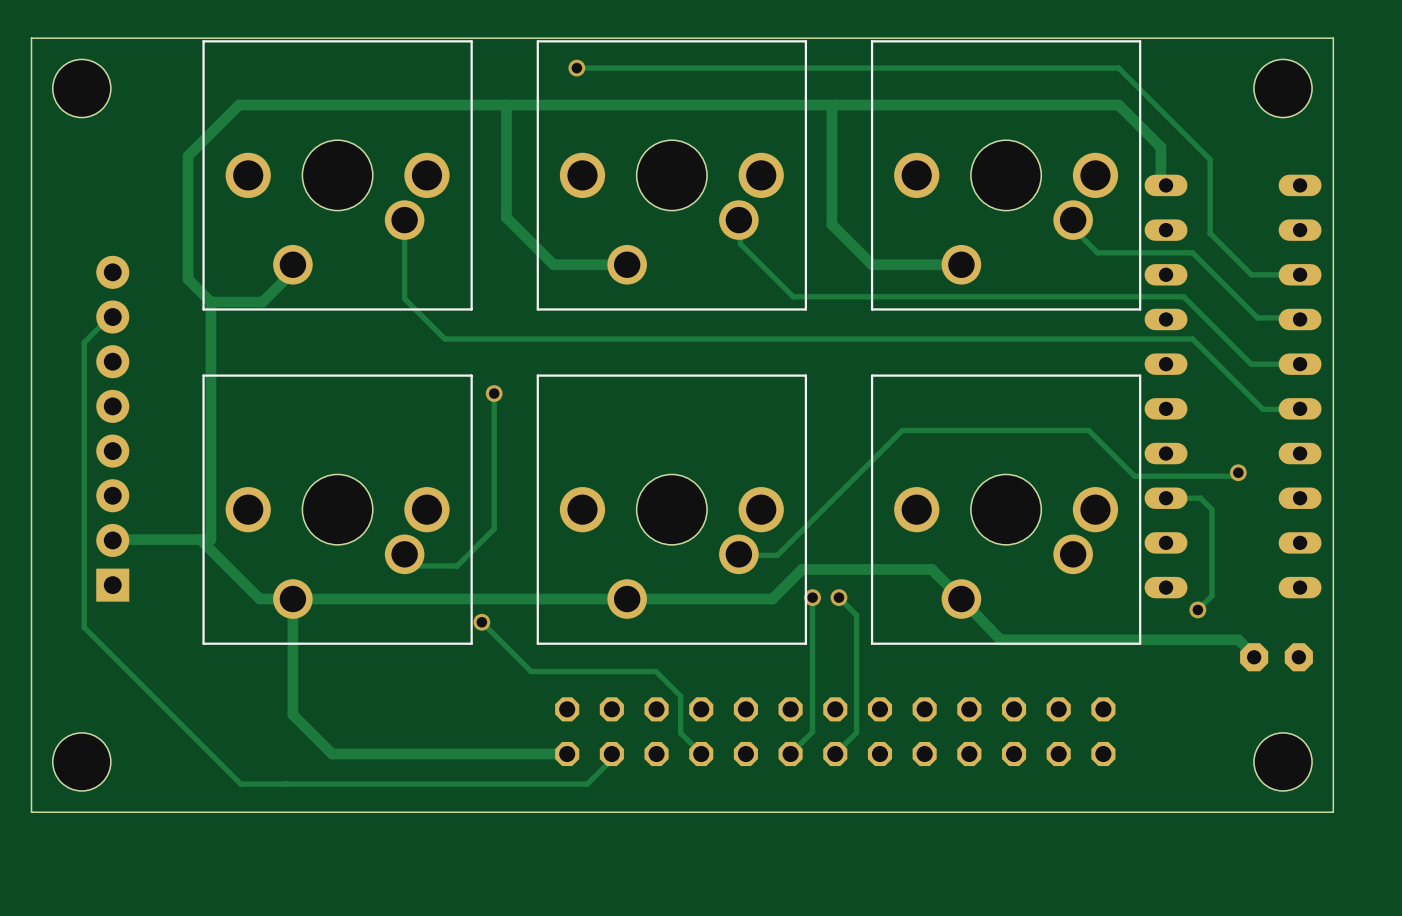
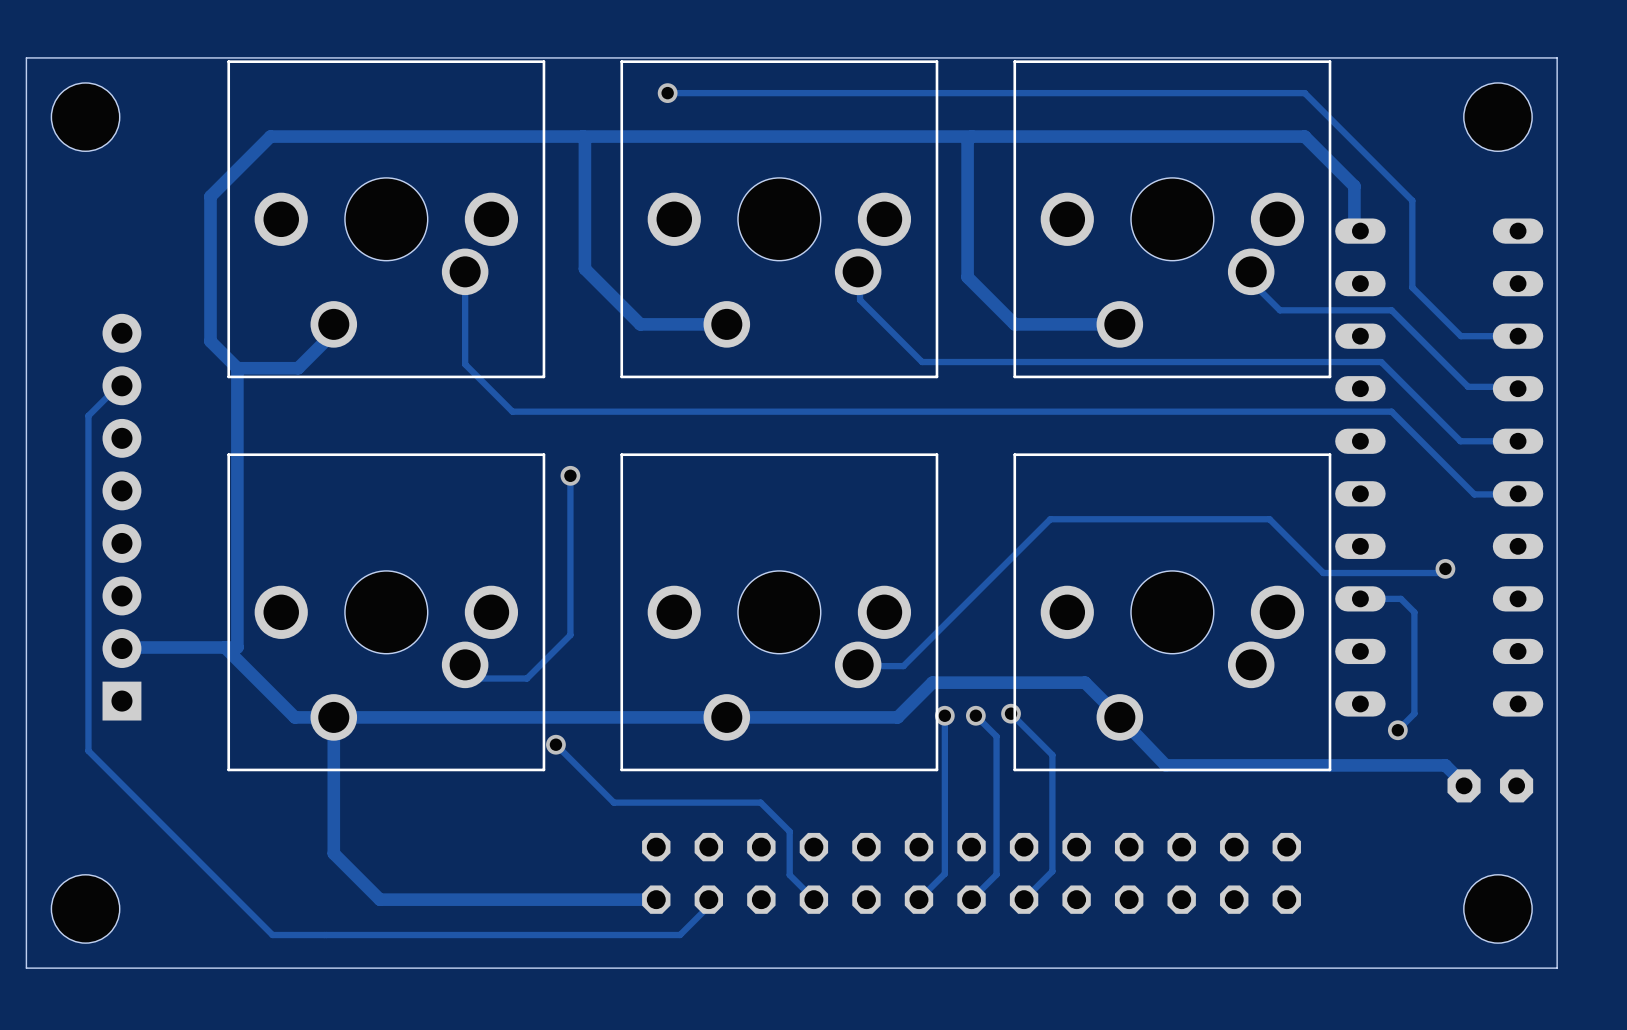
track: none -> (1011, 713) (1052, 755) (1052, 871) (1024, 899)
via: none -> (1011, 713)

